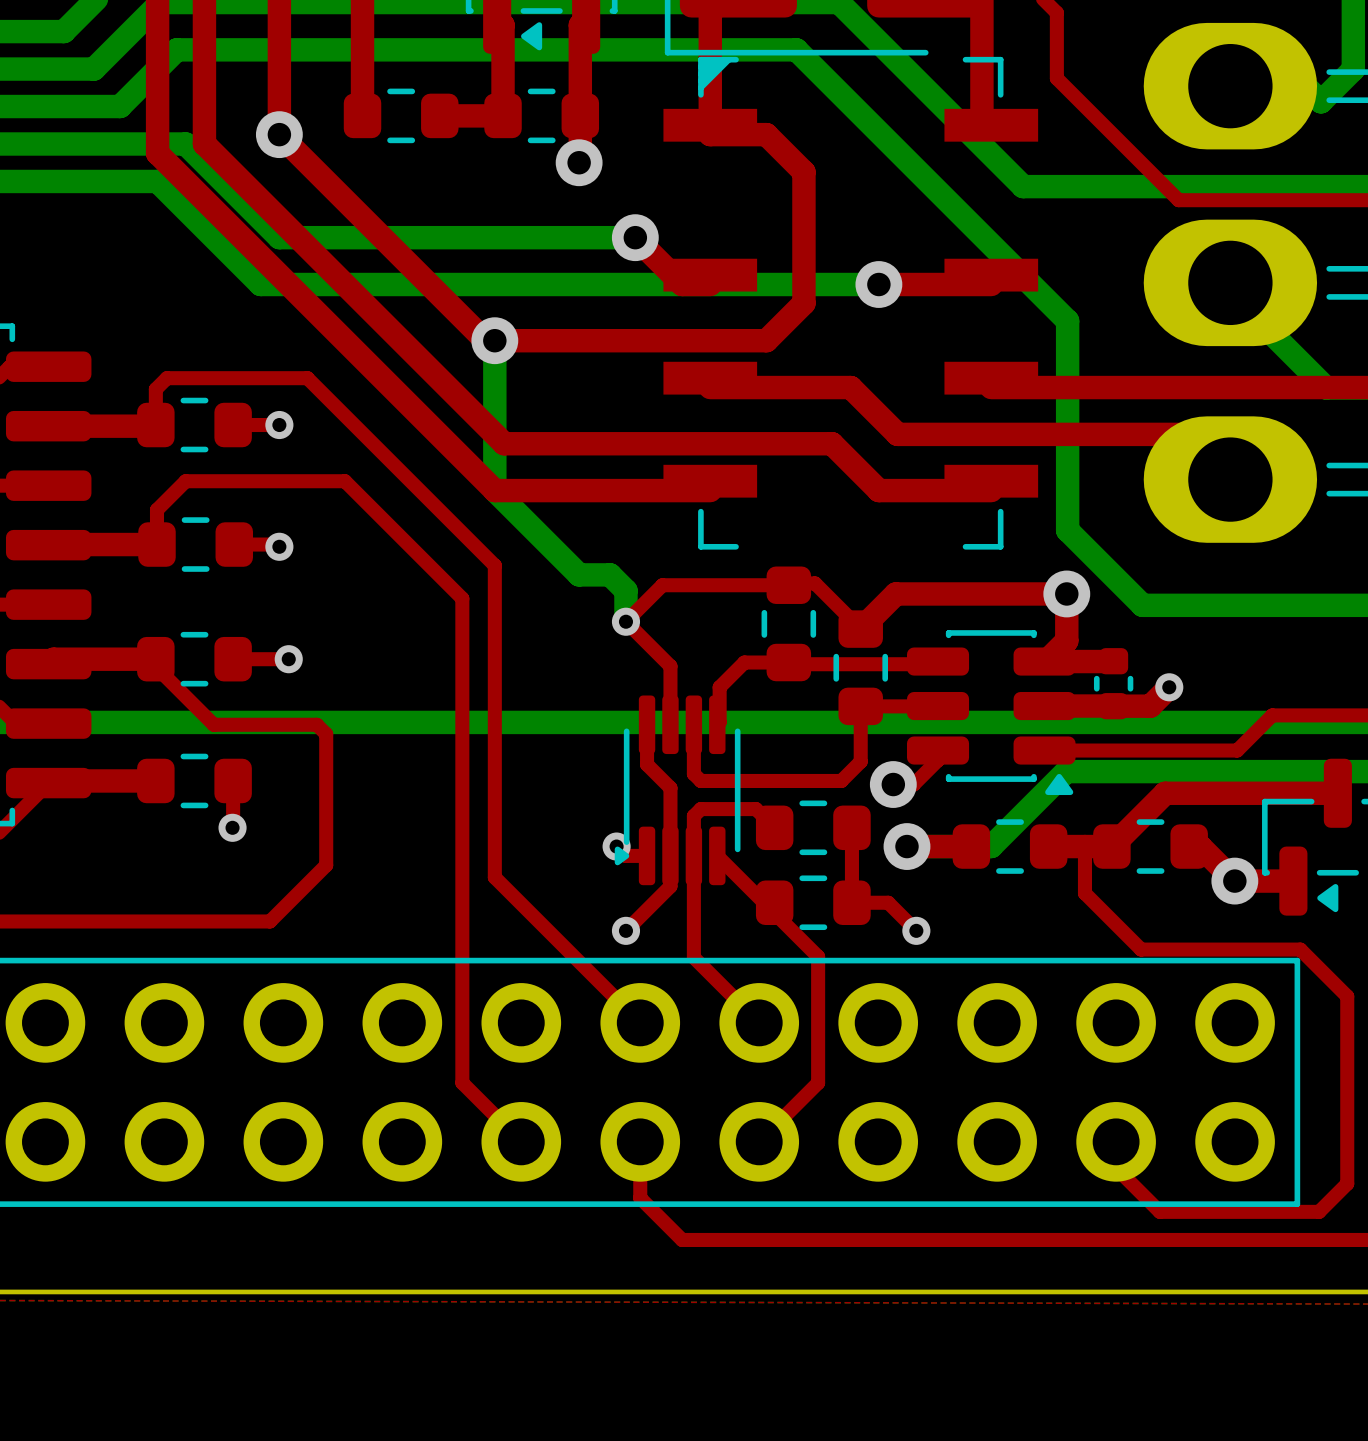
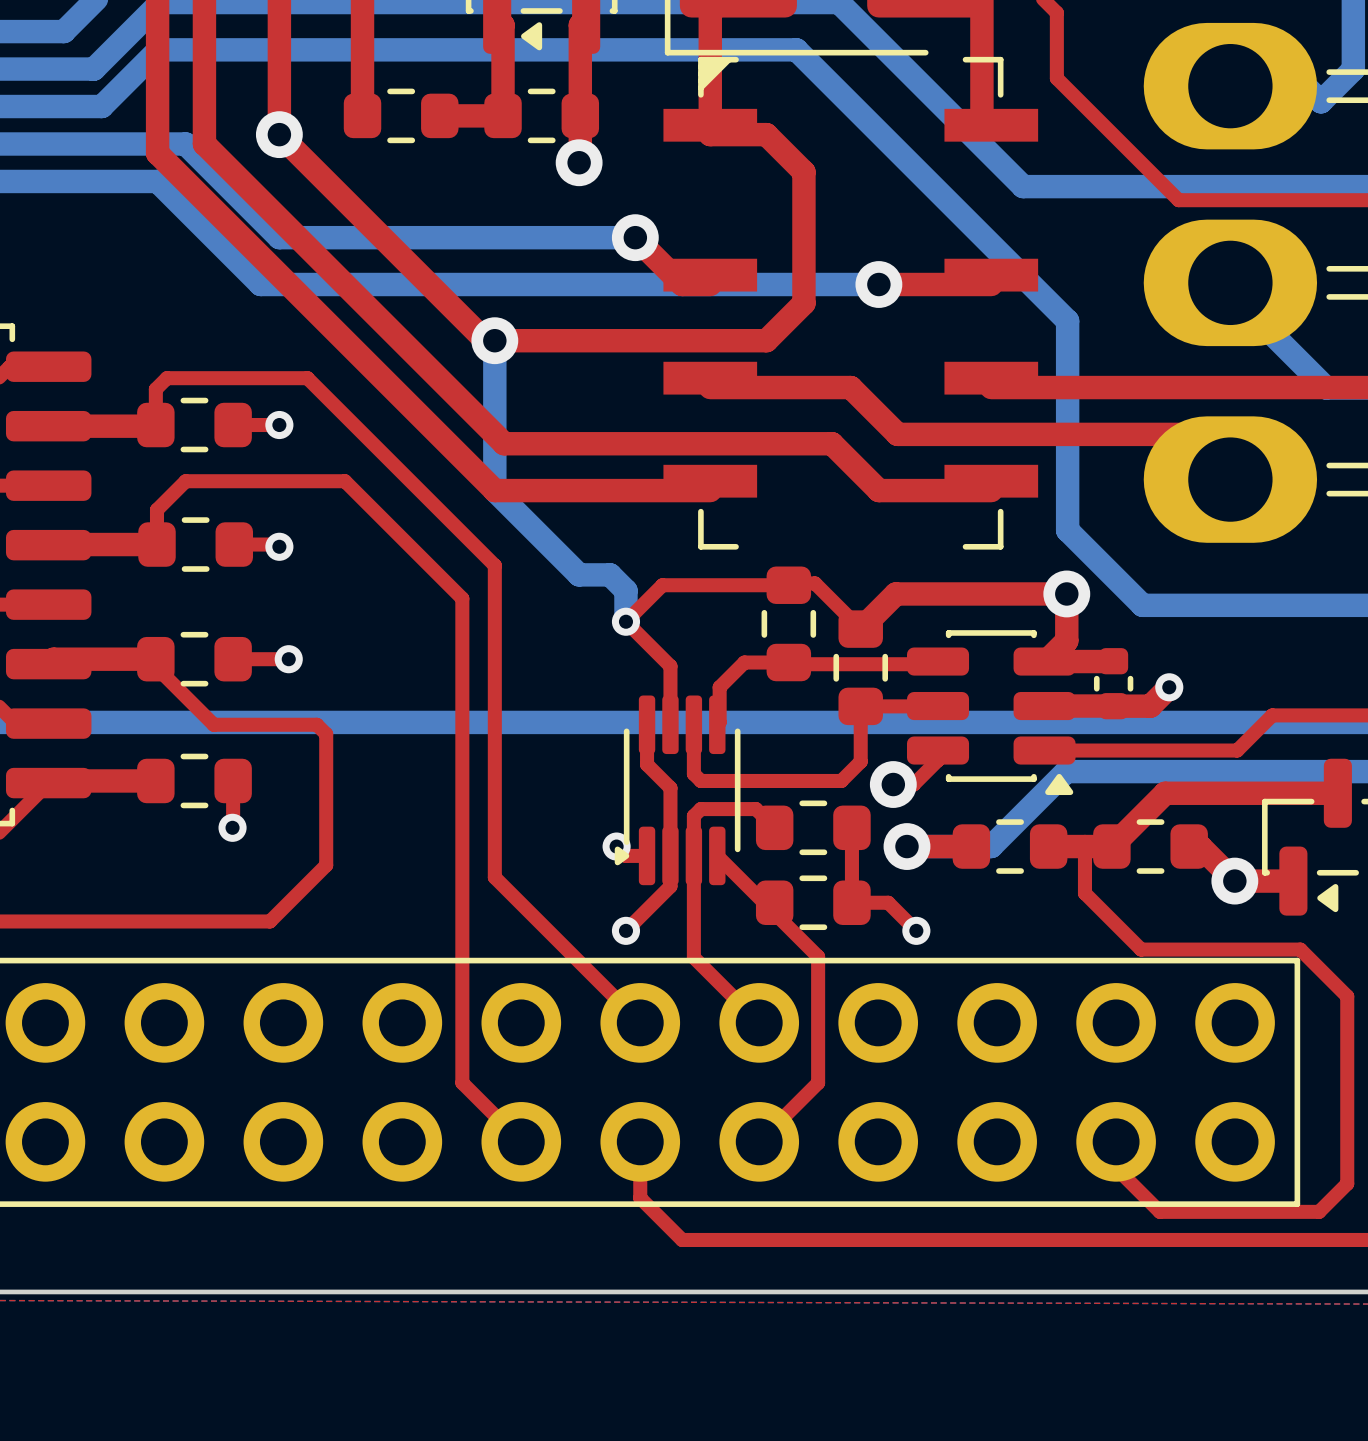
bottom track: (176, 49) (120, 106) (101, 106) -> (176, 49) (158, 49) (101, 106)

